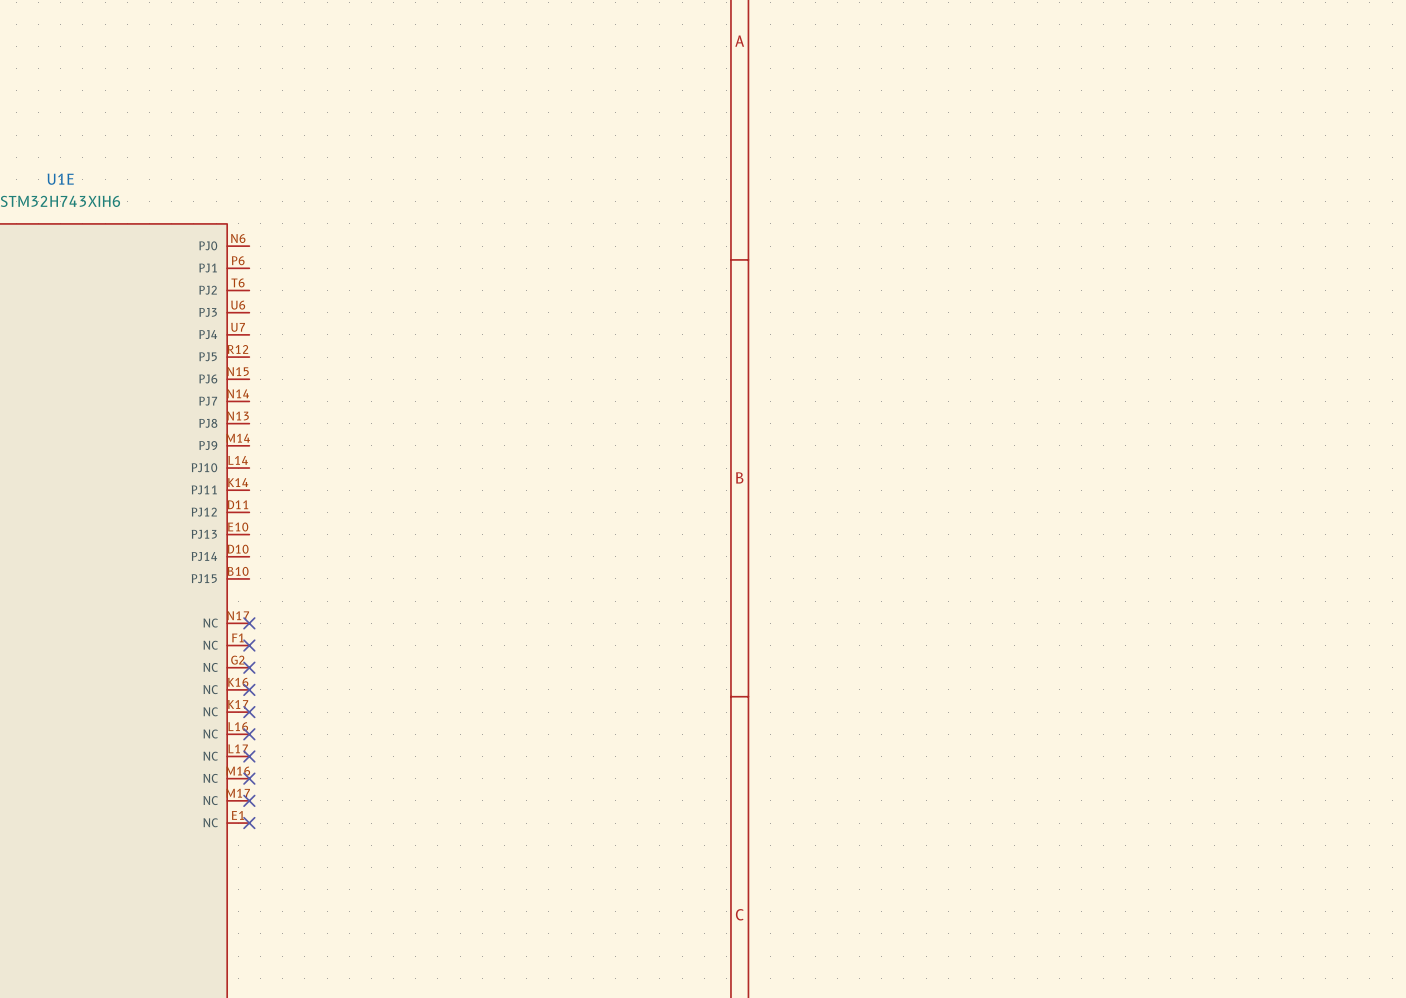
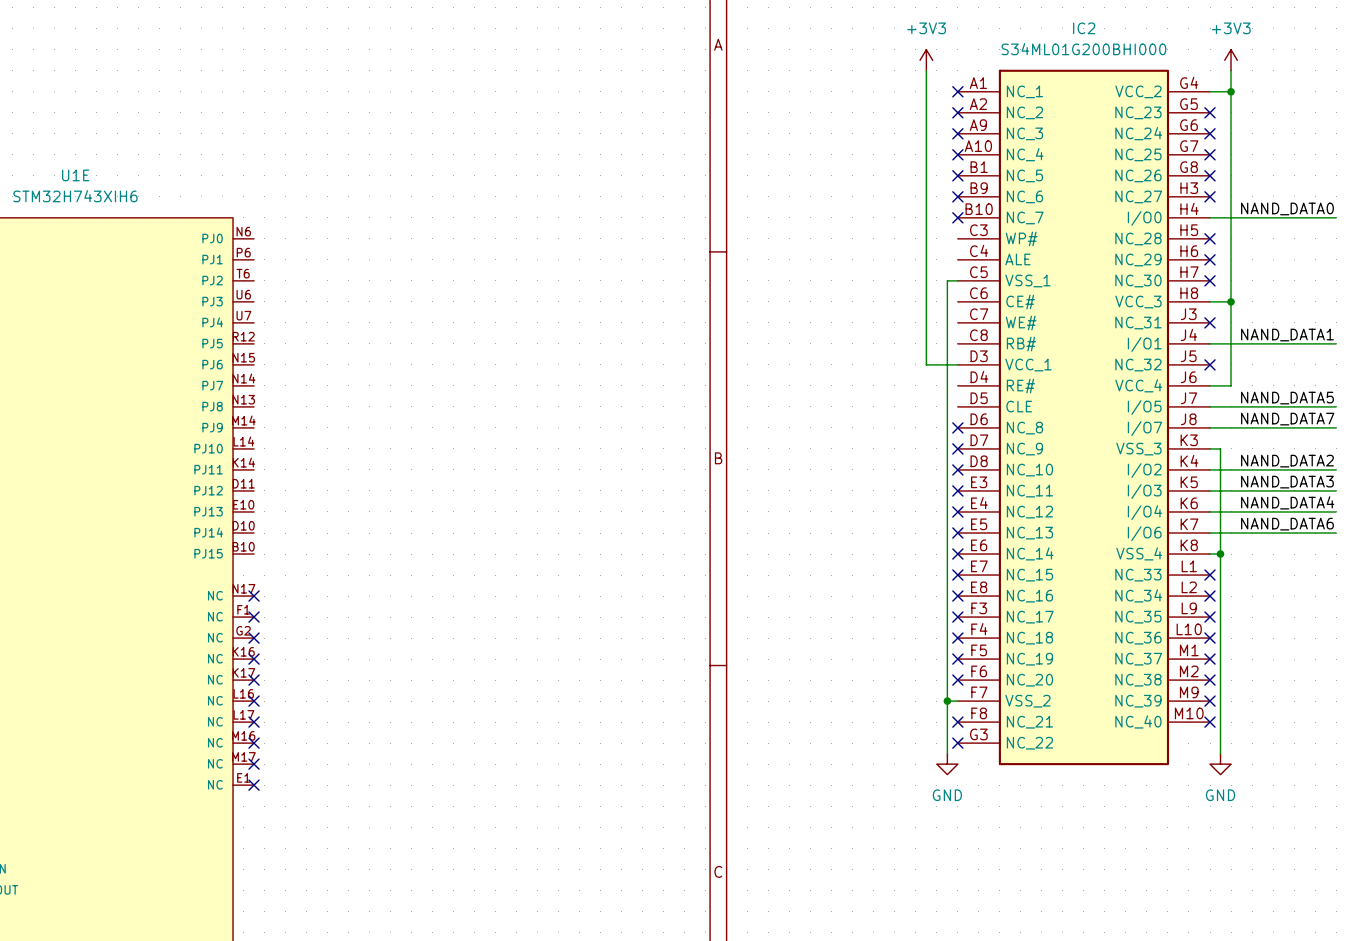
power symbol: none -> +3V3 (926, 60)
power symbol: none -> +3V3 (1231, 60)
wire: none -> (926, 70) (926, 364) (957, 364)
wire: none -> (1231, 70) (1231, 385) (1210, 385)
no-connect mark: none -> (957, 91)
wire: none -> (1210, 91) (1231, 91)
junction: none -> (1231, 91)
no-connect mark: none -> (957, 112)
no-connect mark: none -> (1210, 112)
no-connect mark: none -> (957, 133)
no-connect mark: none -> (1210, 133)
no-connect mark: none -> (957, 154)
no-connect mark: none -> (1210, 154)
no-connect mark: none -> (957, 175)
no-connect mark: none -> (1210, 175)
no-connect mark: none -> (957, 196)
no-connect mark: none -> (1210, 196)
label: none -> NAND_DATA0 (1287, 208)
no-connect mark: none -> (957, 217)
wire: none -> (1210, 217) (1336, 217)
no-connect mark: none -> (1210, 238)
no-connect mark: none -> (1210, 259)
wire: none -> (957, 280) (947, 280) (947, 753)
no-connect mark: none -> (1210, 280)
wire: none -> (1210, 301) (1231, 301)
junction: none -> (1231, 301)
no-connect mark: none -> (1210, 322)
label: none -> NAND_DATA1 (1287, 335)
wire: none -> (1210, 343) (1336, 343)
no-connect mark: none -> (1210, 364)
label: none -> NAND_DATA5 (1287, 398)
wire: none -> (1210, 406) (1336, 406)
IC2: none -> S34ML01G200BHI000 (1083, 417)
label: none -> NAND_DATA7 (1287, 419)
no-connect mark: none -> (957, 427)
wire: none -> (1210, 427) (1336, 427)
no-connect mark: none -> (957, 448)
wire: none -> (1210, 448) (1220, 448) (1220, 753)
label: none -> NAND_DATA2 (1287, 461)
no-connect mark: none -> (957, 469)
wire: none -> (1210, 469) (1336, 469)
label: none -> NAND_DATA3 (1287, 482)
no-connect mark: none -> (957, 490)
wire: none -> (1210, 490) (1336, 490)
label: none -> NAND_DATA4 (1287, 502)
no-connect mark: none -> (957, 511)
wire: none -> (1210, 511) (1336, 511)
label: none -> NAND_DATA6 (1287, 524)
no-connect mark: none -> (957, 533)
wire: none -> (1210, 533) (1336, 533)
no-connect mark: none -> (957, 554)
wire: none -> (1210, 554) (1220, 554)
junction: none -> (1220, 554)
no-connect mark: none -> (957, 575)
no-connect mark: none -> (1210, 575)
no-connect mark: none -> (957, 596)
no-connect mark: none -> (1210, 596)
no-connect mark: none -> (957, 617)
no-connect mark: none -> (1210, 617)
no-connect mark: none -> (957, 638)
no-connect mark: none -> (1210, 638)
no-connect mark: none -> (957, 659)
no-connect mark: none -> (1210, 659)
no-connect mark: none -> (957, 680)
no-connect mark: none -> (1210, 680)
wire: none -> (947, 701) (957, 701)
junction: none -> (947, 701)
no-connect mark: none -> (1210, 701)
no-connect mark: none -> (957, 722)
no-connect mark: none -> (1210, 722)
no-connect mark: none -> (957, 743)
power symbol: none -> GND (947, 764)
power symbol: none -> GND (1220, 764)

